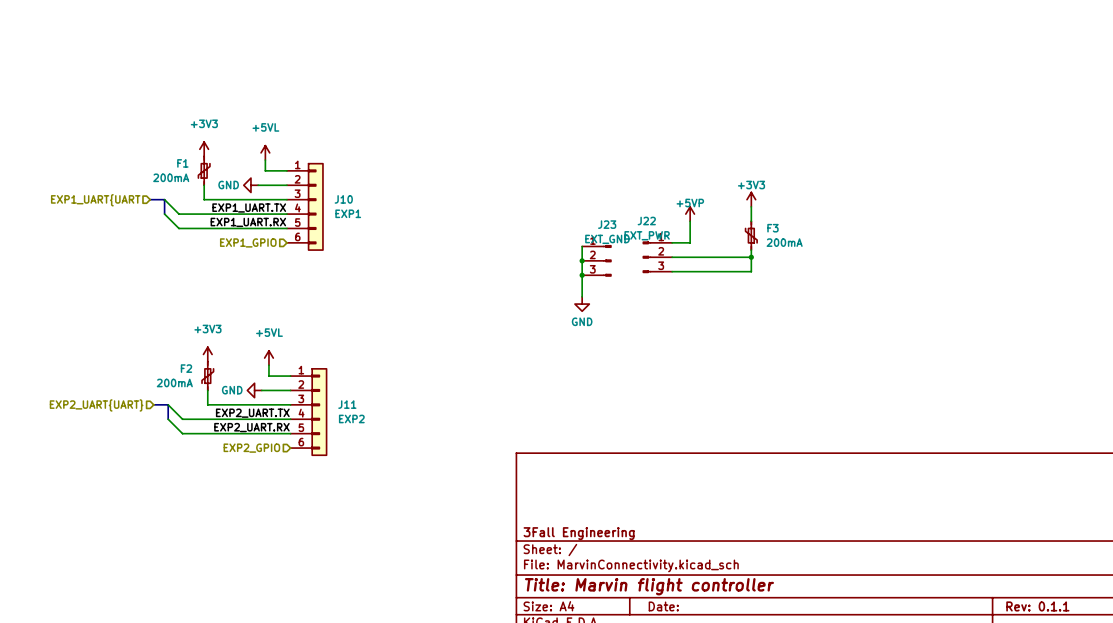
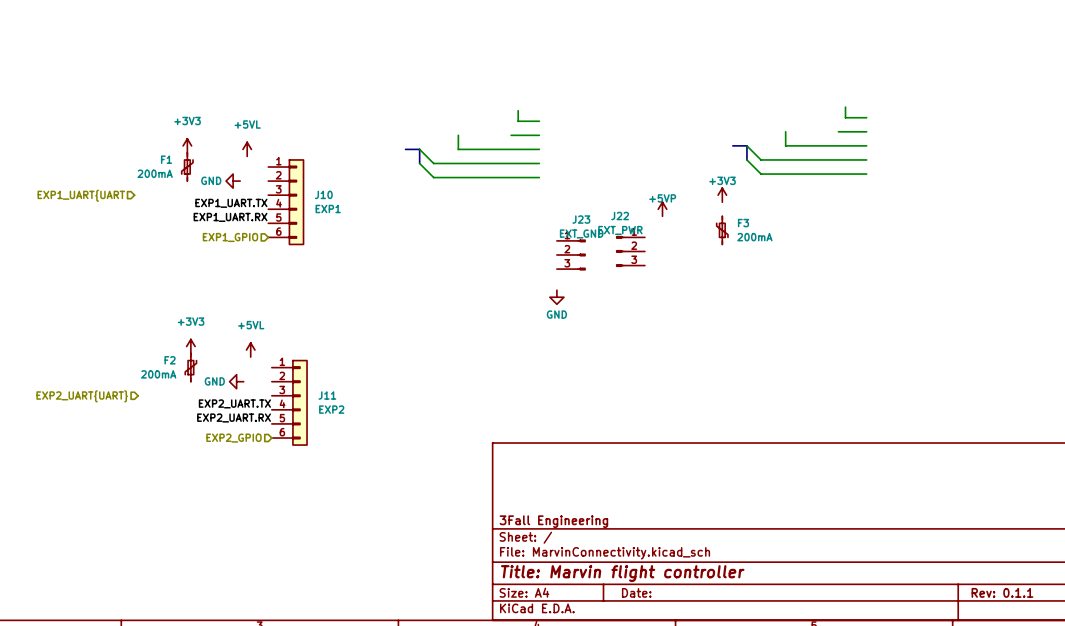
wire: none -> (845, 107) (845, 117) (866, 117)
wire: none -> (518, 110) (518, 121) (539, 121)
wire: none -> (785, 131) (785, 145) (866, 145)
wire: none -> (838, 131) (866, 131)
wire: none -> (458, 135) (458, 149) (539, 149)
wire: none -> (511, 135) (539, 135)
bus: none -> (732, 145) (746, 145) (746, 159)
wire: none -> (746, 145) (761, 159)
bus: none -> (405, 149) (419, 149) (419, 163)
wire: none -> (419, 149) (433, 163) (539, 163)
wire: (265, 160) (265, 170) (286, 170) -> none
wire: none -> (746, 159) (761, 174)
wire: none -> (761, 159) (866, 159)
wire: none -> (419, 163) (433, 177) (539, 177)
wire: none -> (761, 174) (866, 174)
wire: (204, 185) (204, 199) (286, 199) -> none
wire: (258, 185) (286, 185) -> none
bus: (150, 199) (164, 199) (164, 214) -> none
wire: (164, 199) (178, 214) -> none
wire: (751, 206) (751, 221) -> none
wire: (164, 214) (178, 228) -> none
wire: (178, 214) (286, 214) -> none
wire: (690, 221) (690, 242) (672, 242) -> none
wire: (178, 228) (286, 228) -> none
wire: (582, 246) (582, 296) -> none
wire: (751, 250) (751, 271) (672, 271) -> none
wire: (672, 257) (751, 257) -> none
junction: (751, 257) -> none
junction: (582, 260) -> none
junction: (582, 275) -> none
wire: (268, 365) (268, 376) (290, 376) -> none
wire: (207, 390) (207, 404) (290, 404) -> none
wire: (261, 390) (290, 390) -> none
bus: (153, 404) (168, 404) (168, 419) -> none
wire: (168, 404) (182, 419) (290, 419) -> none
wire: (168, 419) (182, 433) (290, 433) -> none

